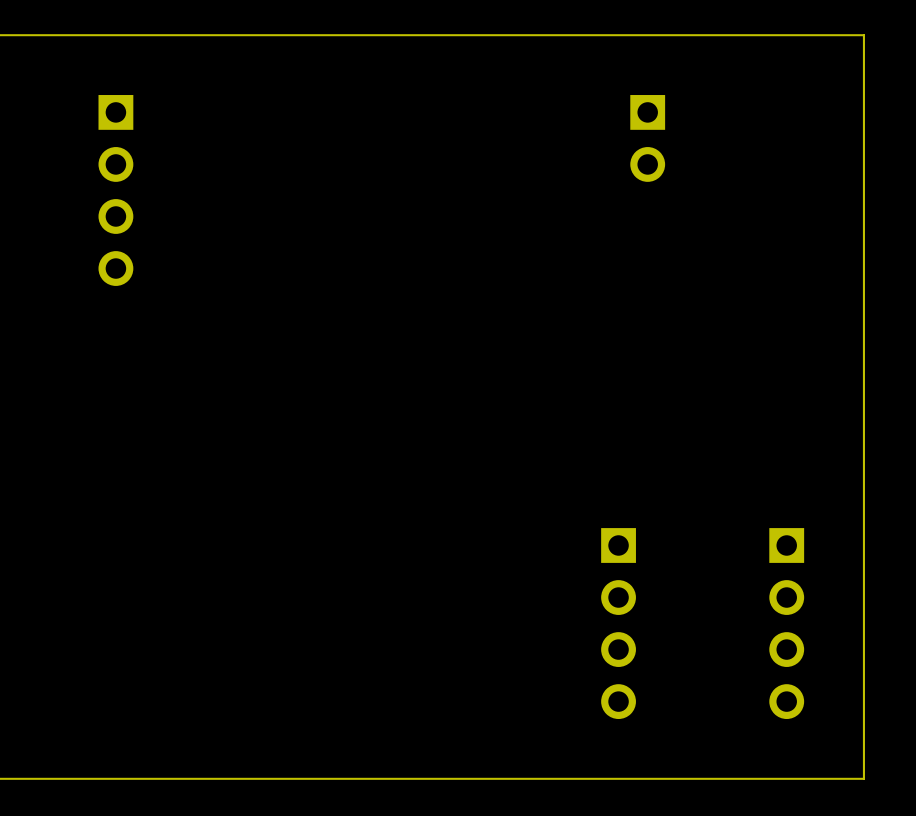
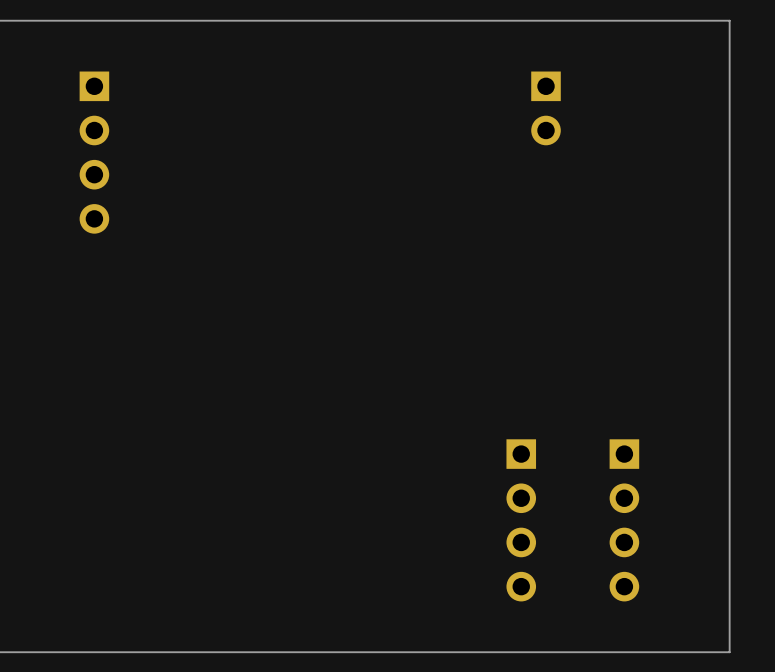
part position: (786, 623) -> (624, 520)

